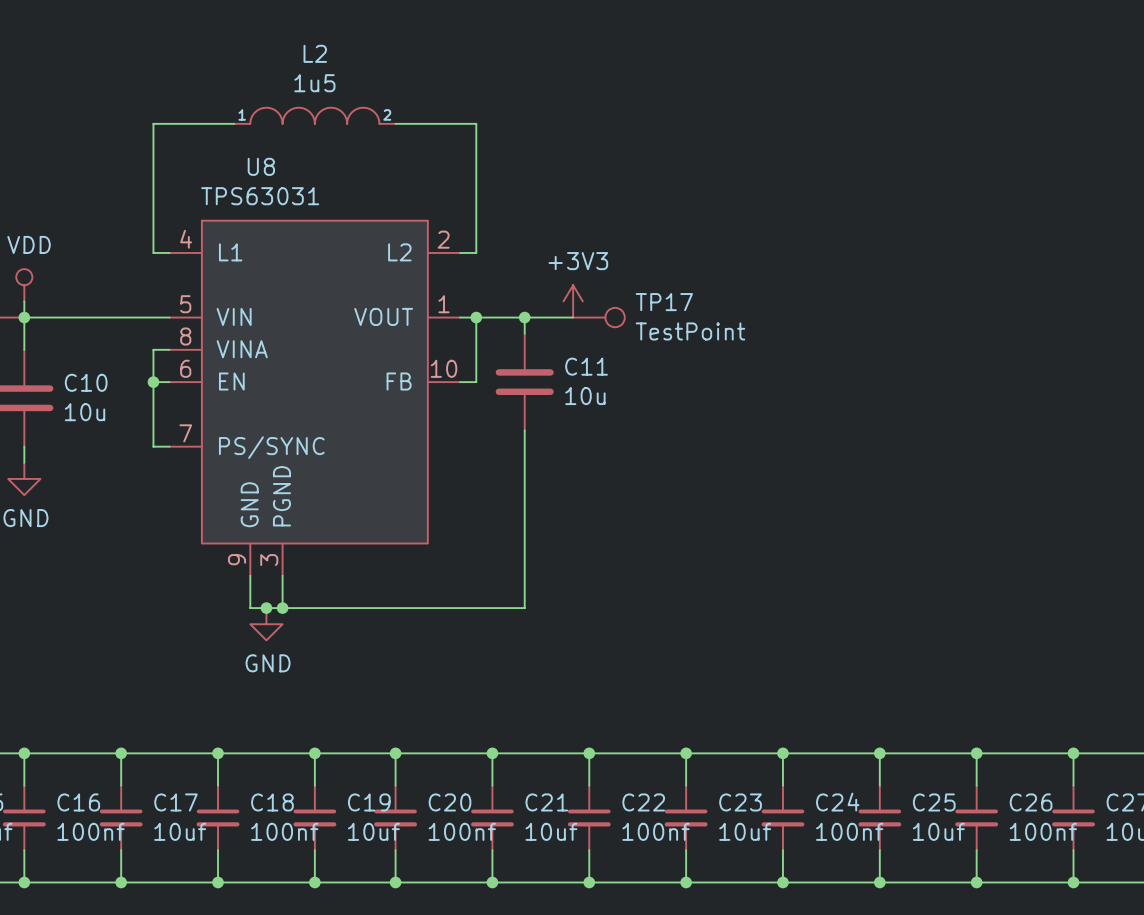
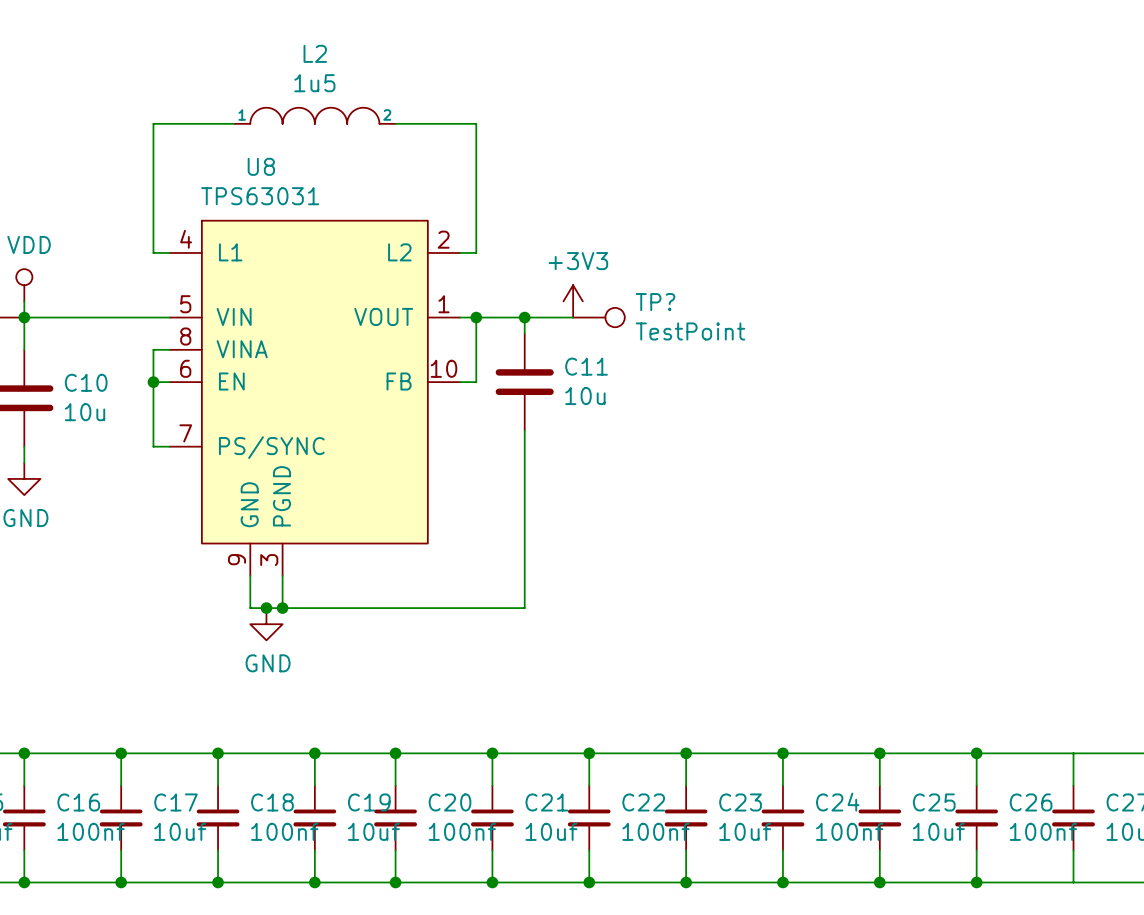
TP17 name: TP17 (664, 302) -> TP? (655, 302)
junction: (1073, 753) -> none
junction: (1073, 882) -> none

